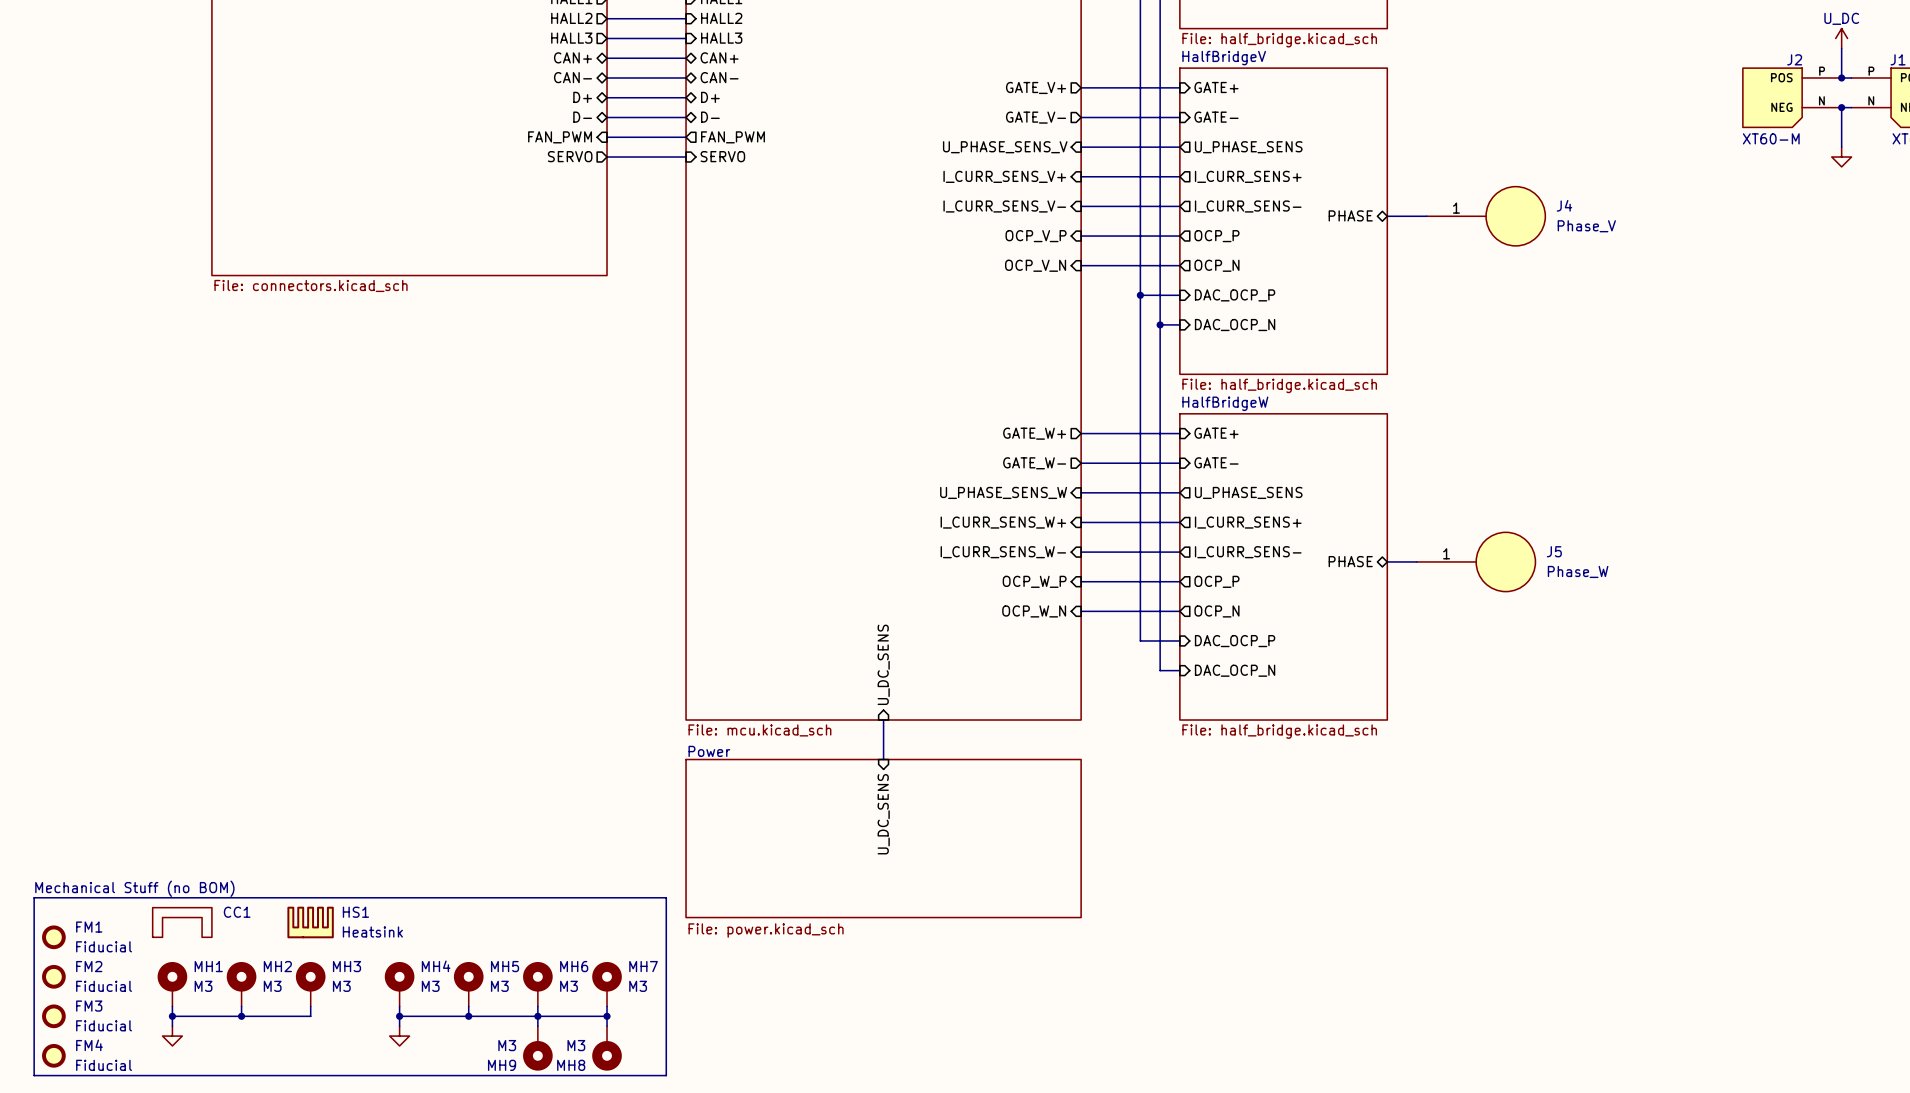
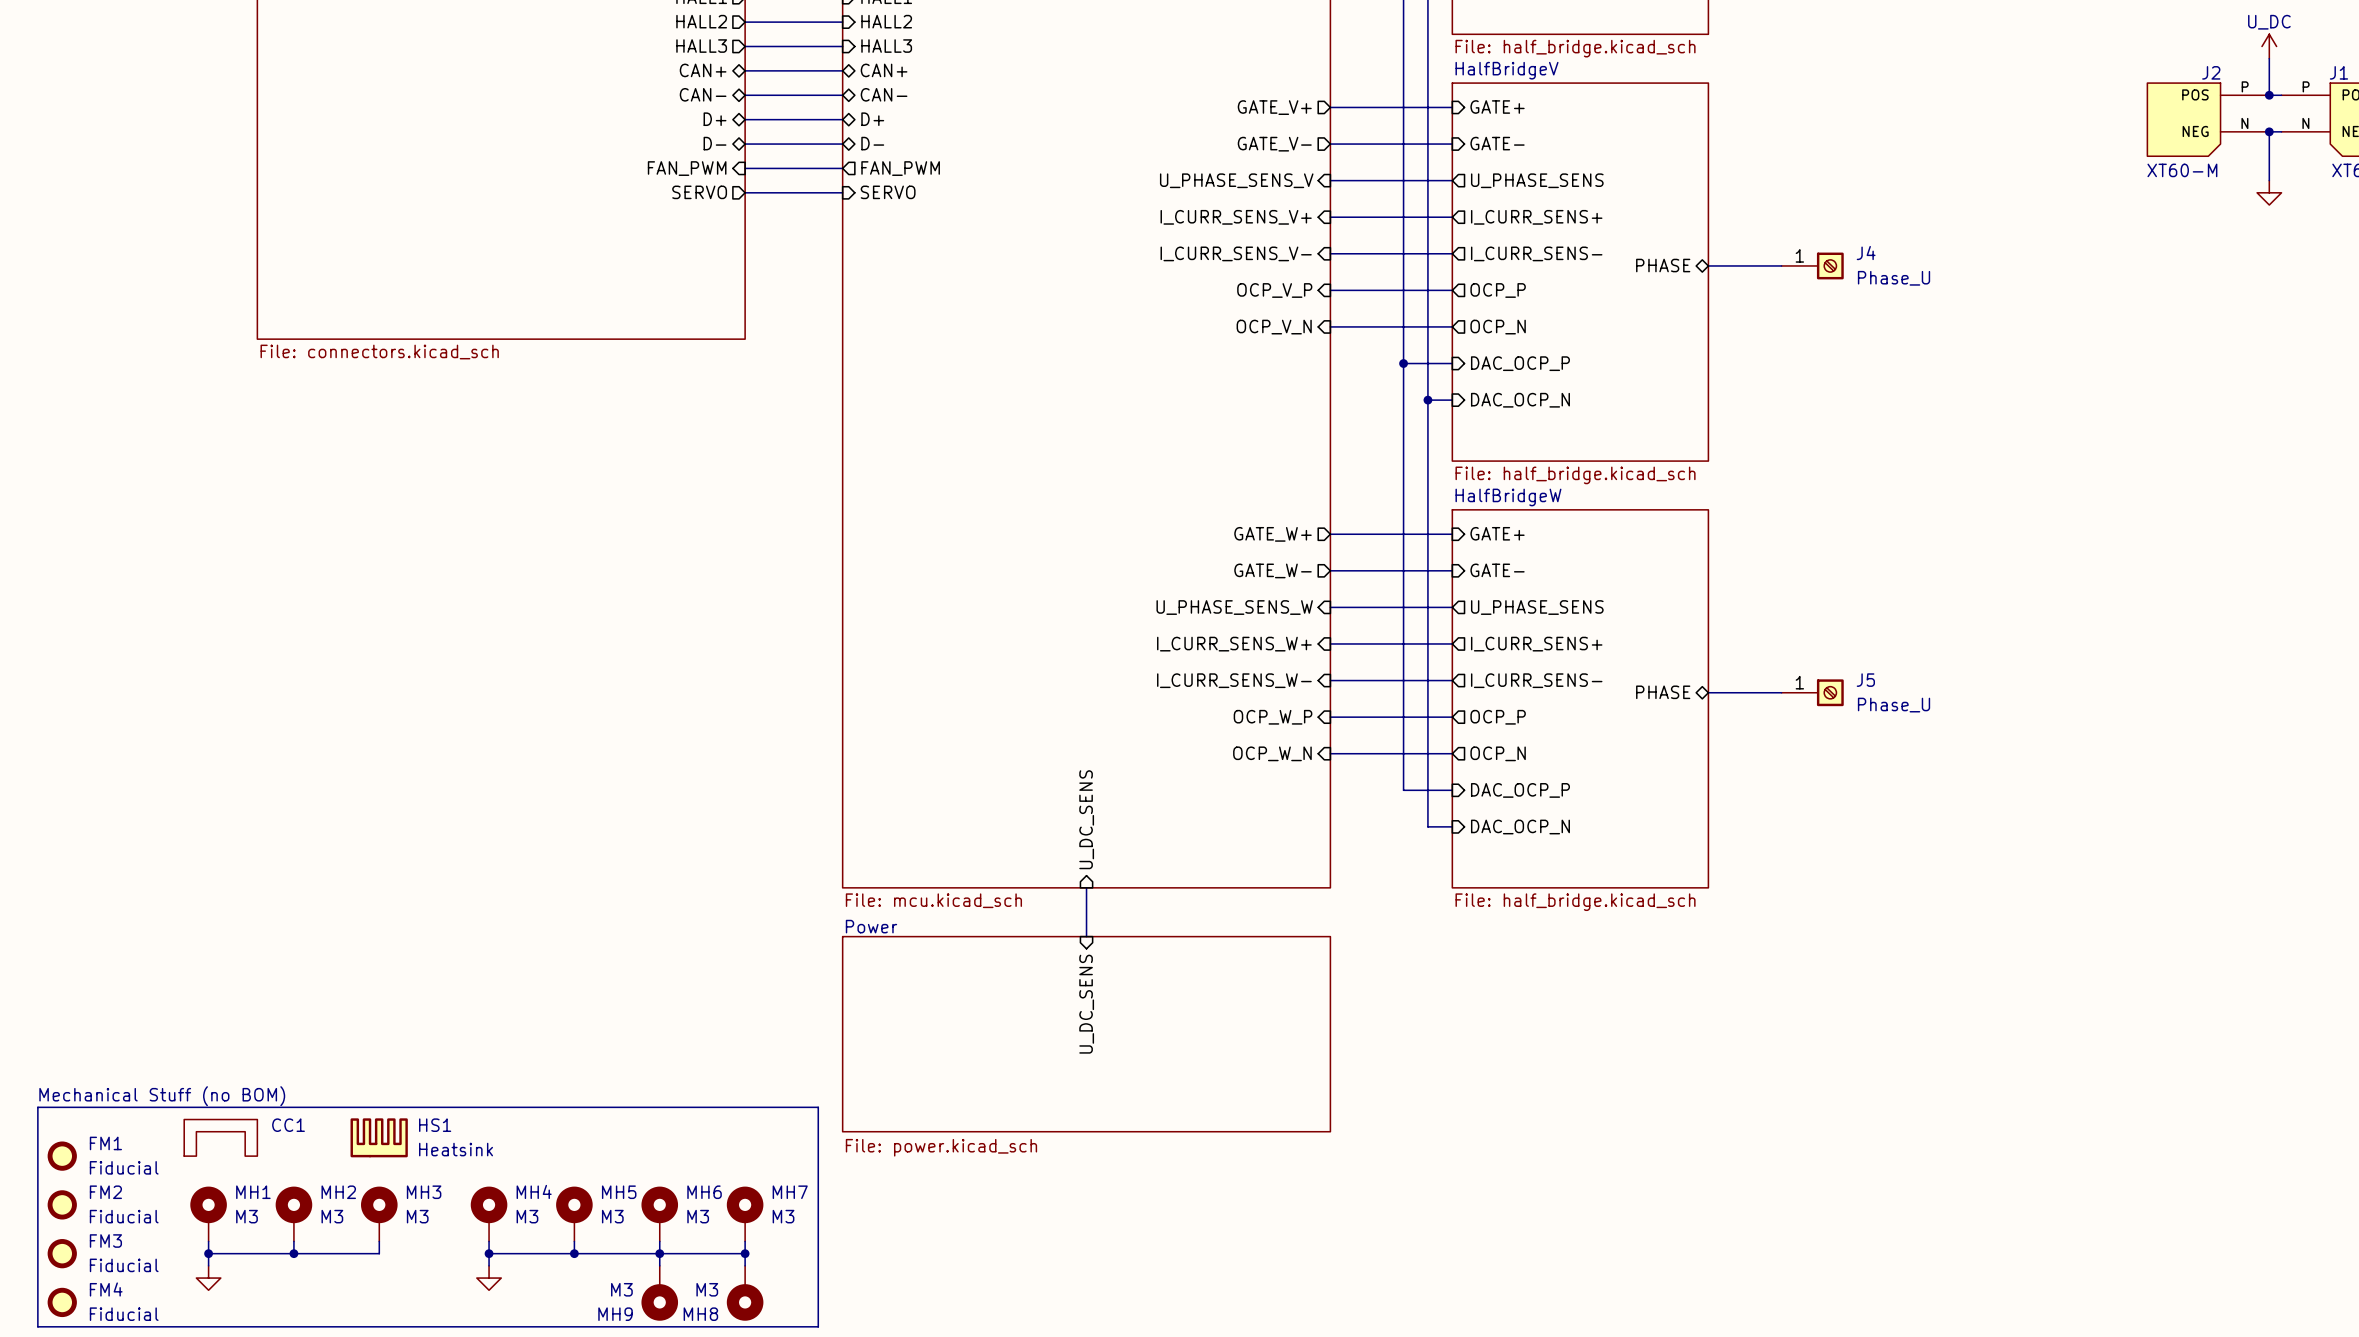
J4 symbol: [1426, 186, 1546, 246] -> [1781, 252, 1844, 280]
J4 name position: J4 (1564, 205) -> J4 (1866, 253)
J4 value: Phase_V (1586, 226) -> Phase_U (1894, 278)
J5 symbol: [1416, 532, 1536, 592] -> [1781, 679, 1844, 707]
J5 name position: J5 (1554, 551) -> J5 (1865, 680)
J5 value: Phase_W (1578, 571) -> Phase_U (1894, 705)

